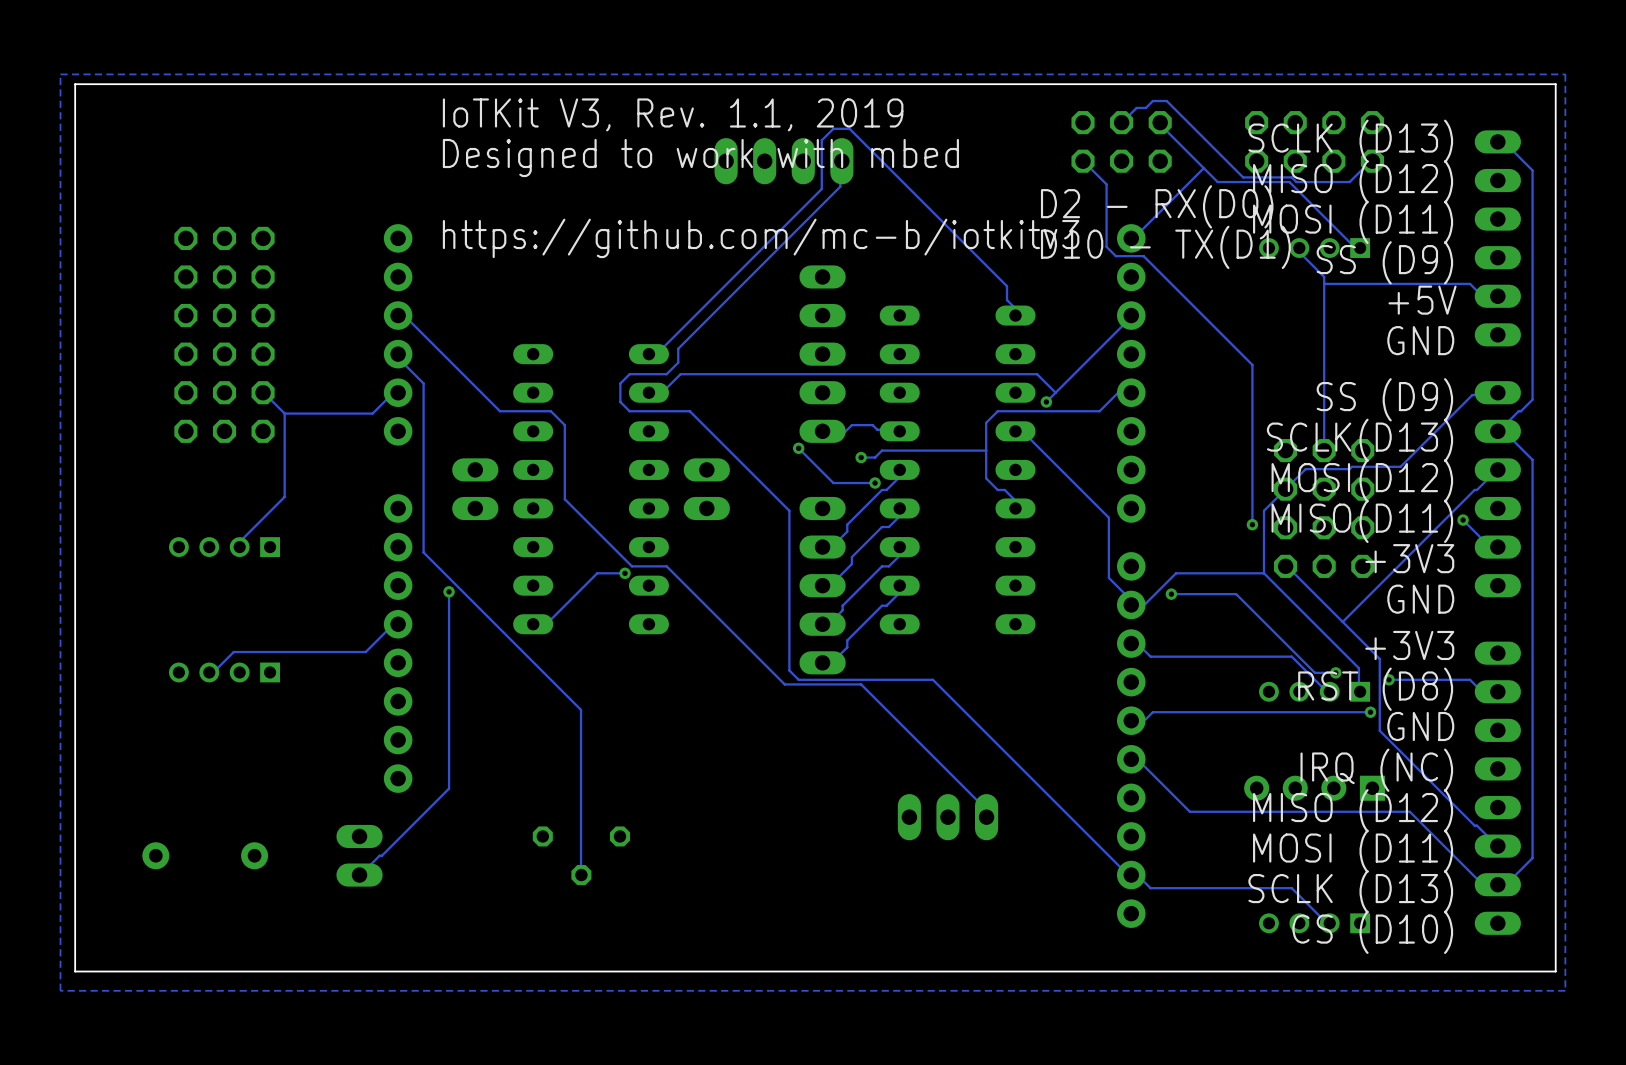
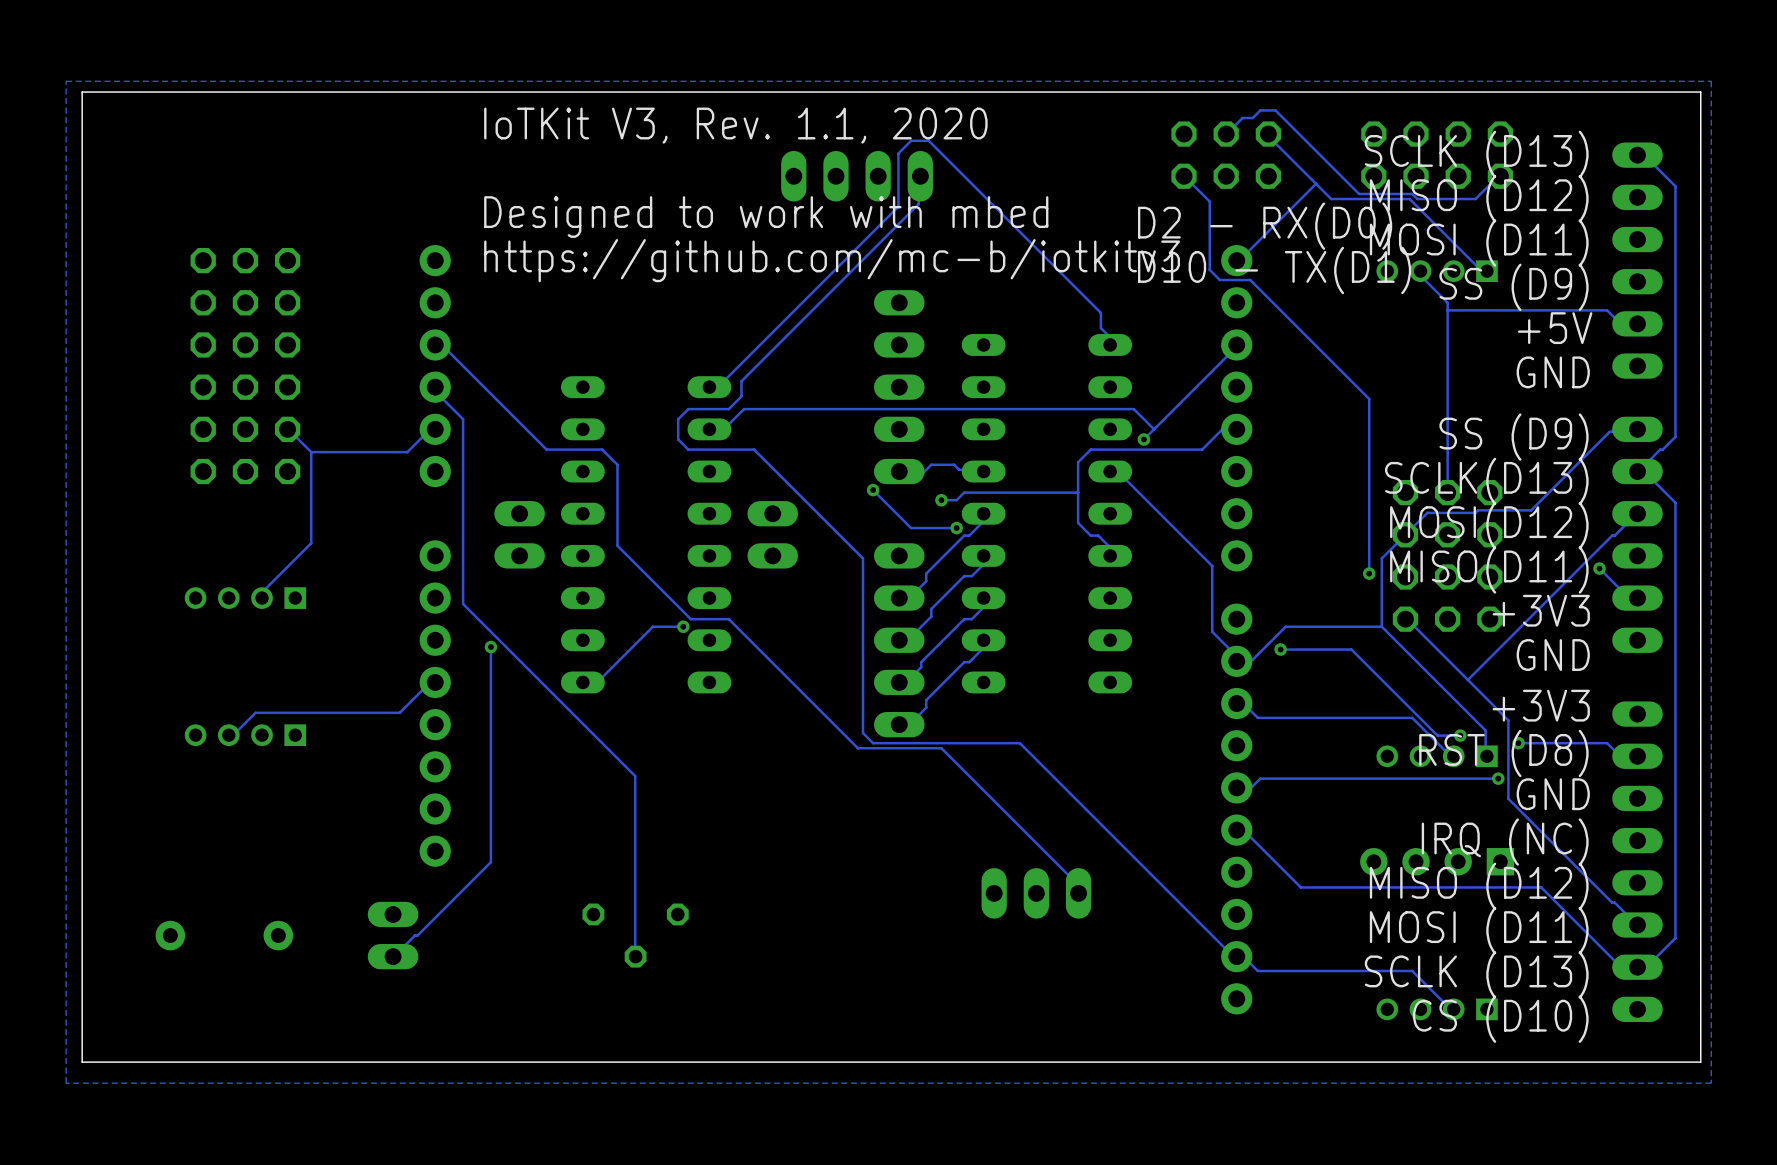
text: IoTKit V3, Rev. 1.1, 2019 (673, 114) -> IoTKit V3, Rev. 1.1, 2020 (735, 125)
text position: Designed to work with mbed (700, 157) -> Designed to work with mbed (766, 217)

